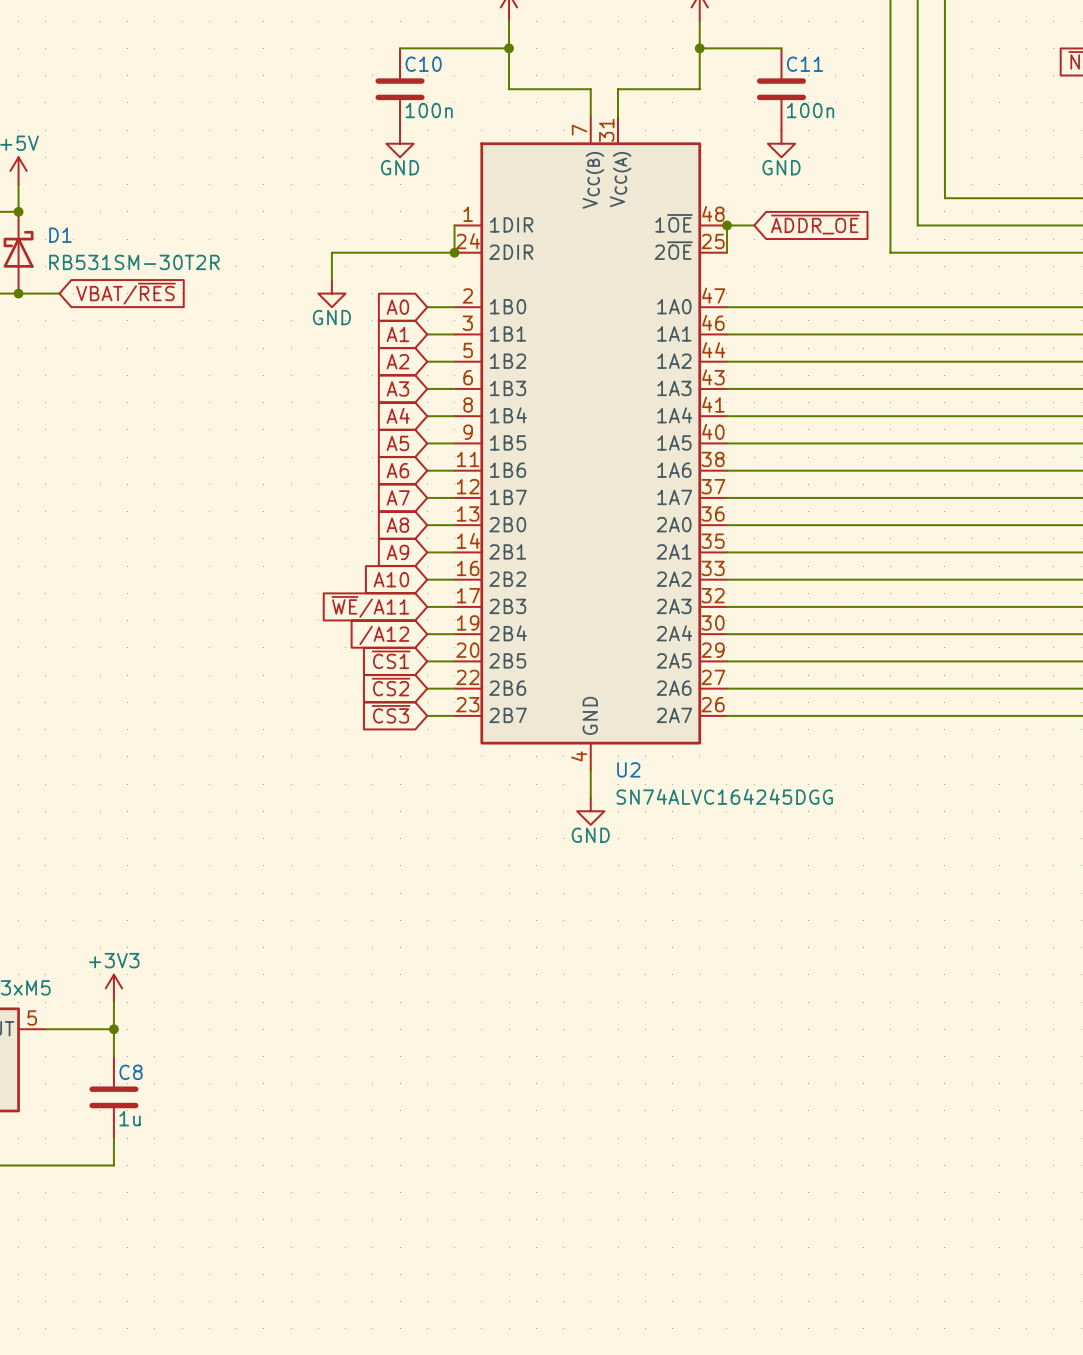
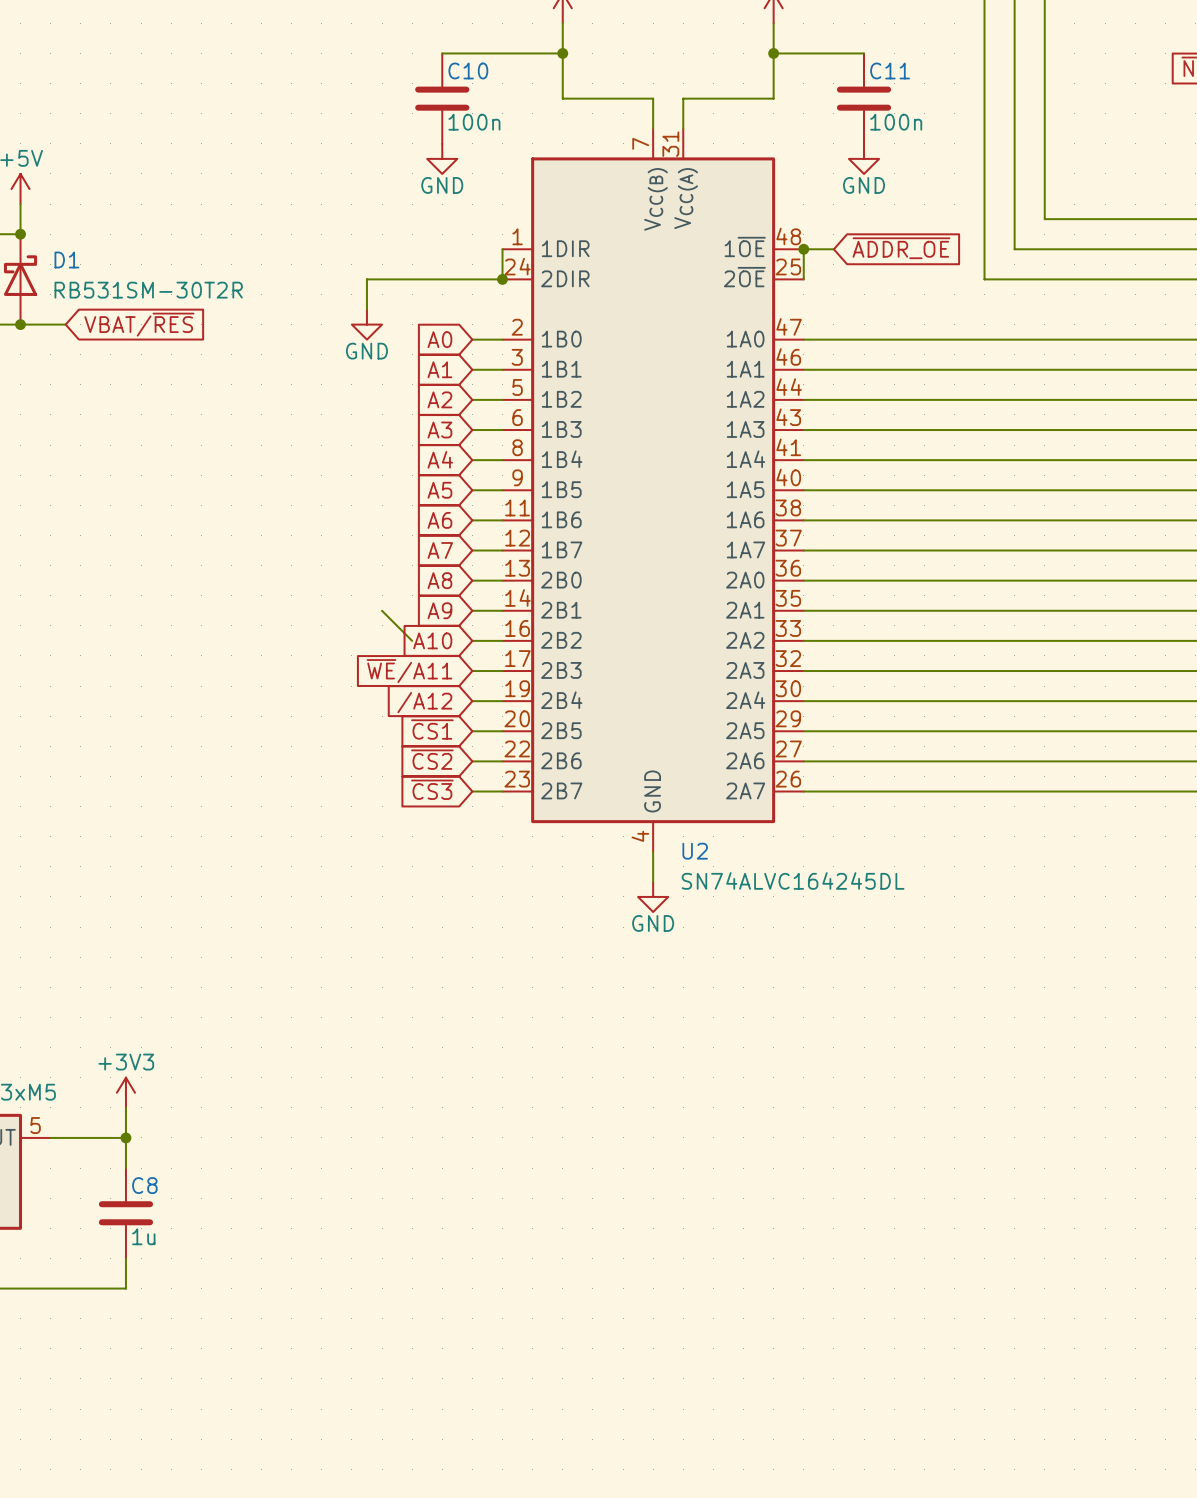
wire: none -> (382, 610) (412, 640)
U2 value: SN74ALVC164245DGG (724, 796) -> SN74ALVC164245DL (793, 880)

